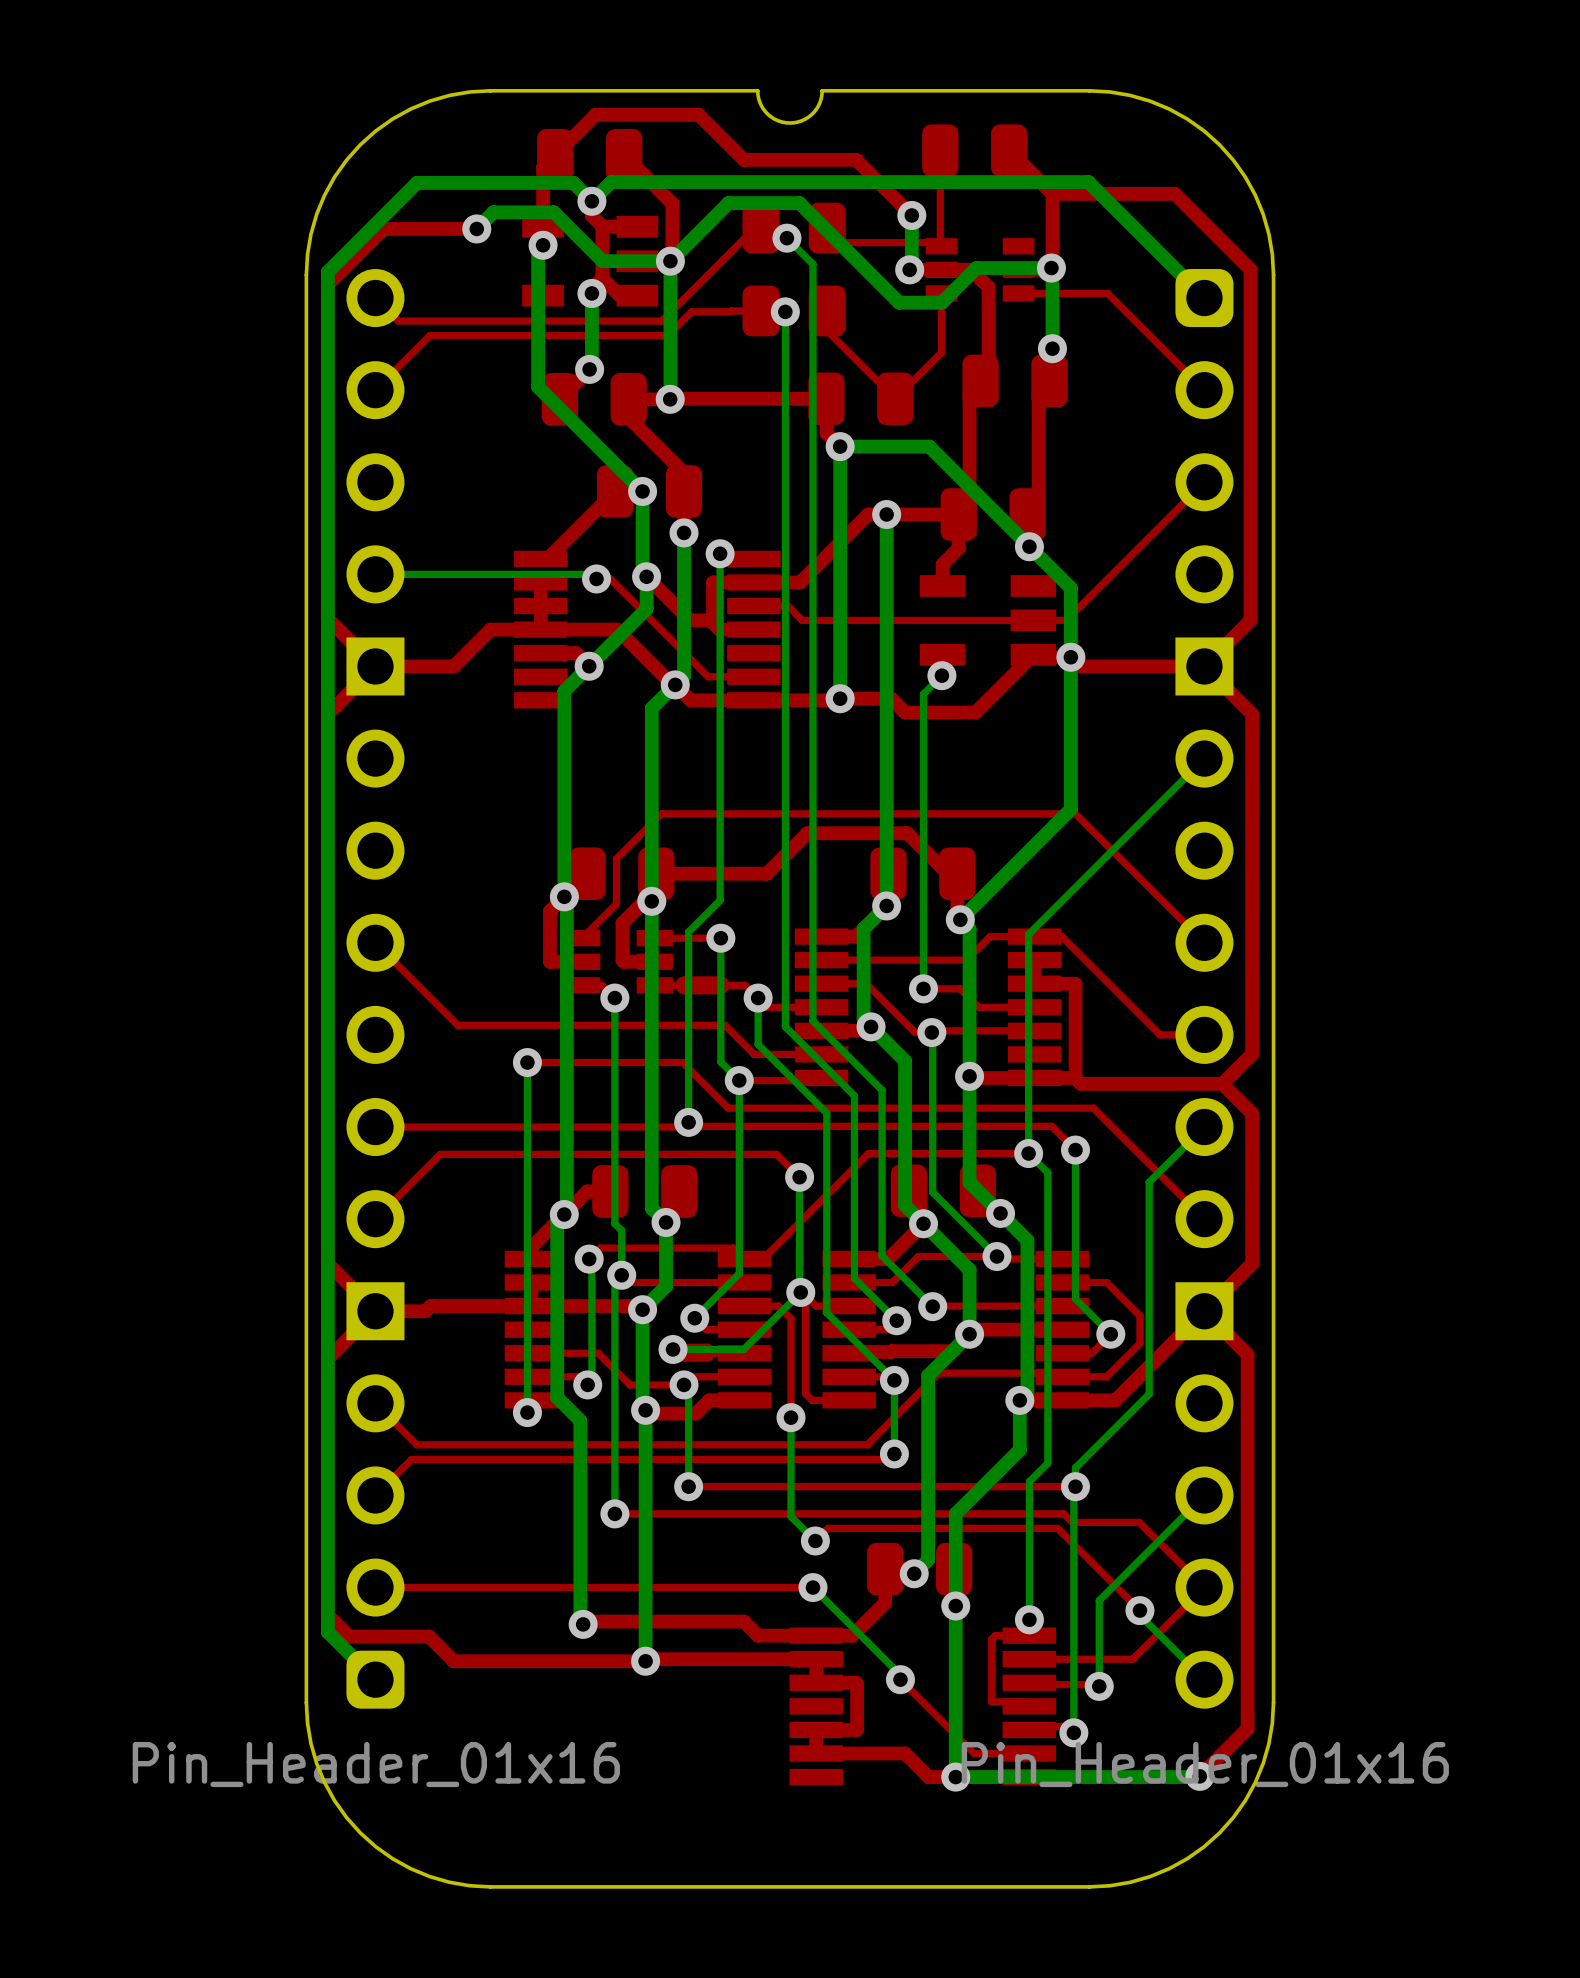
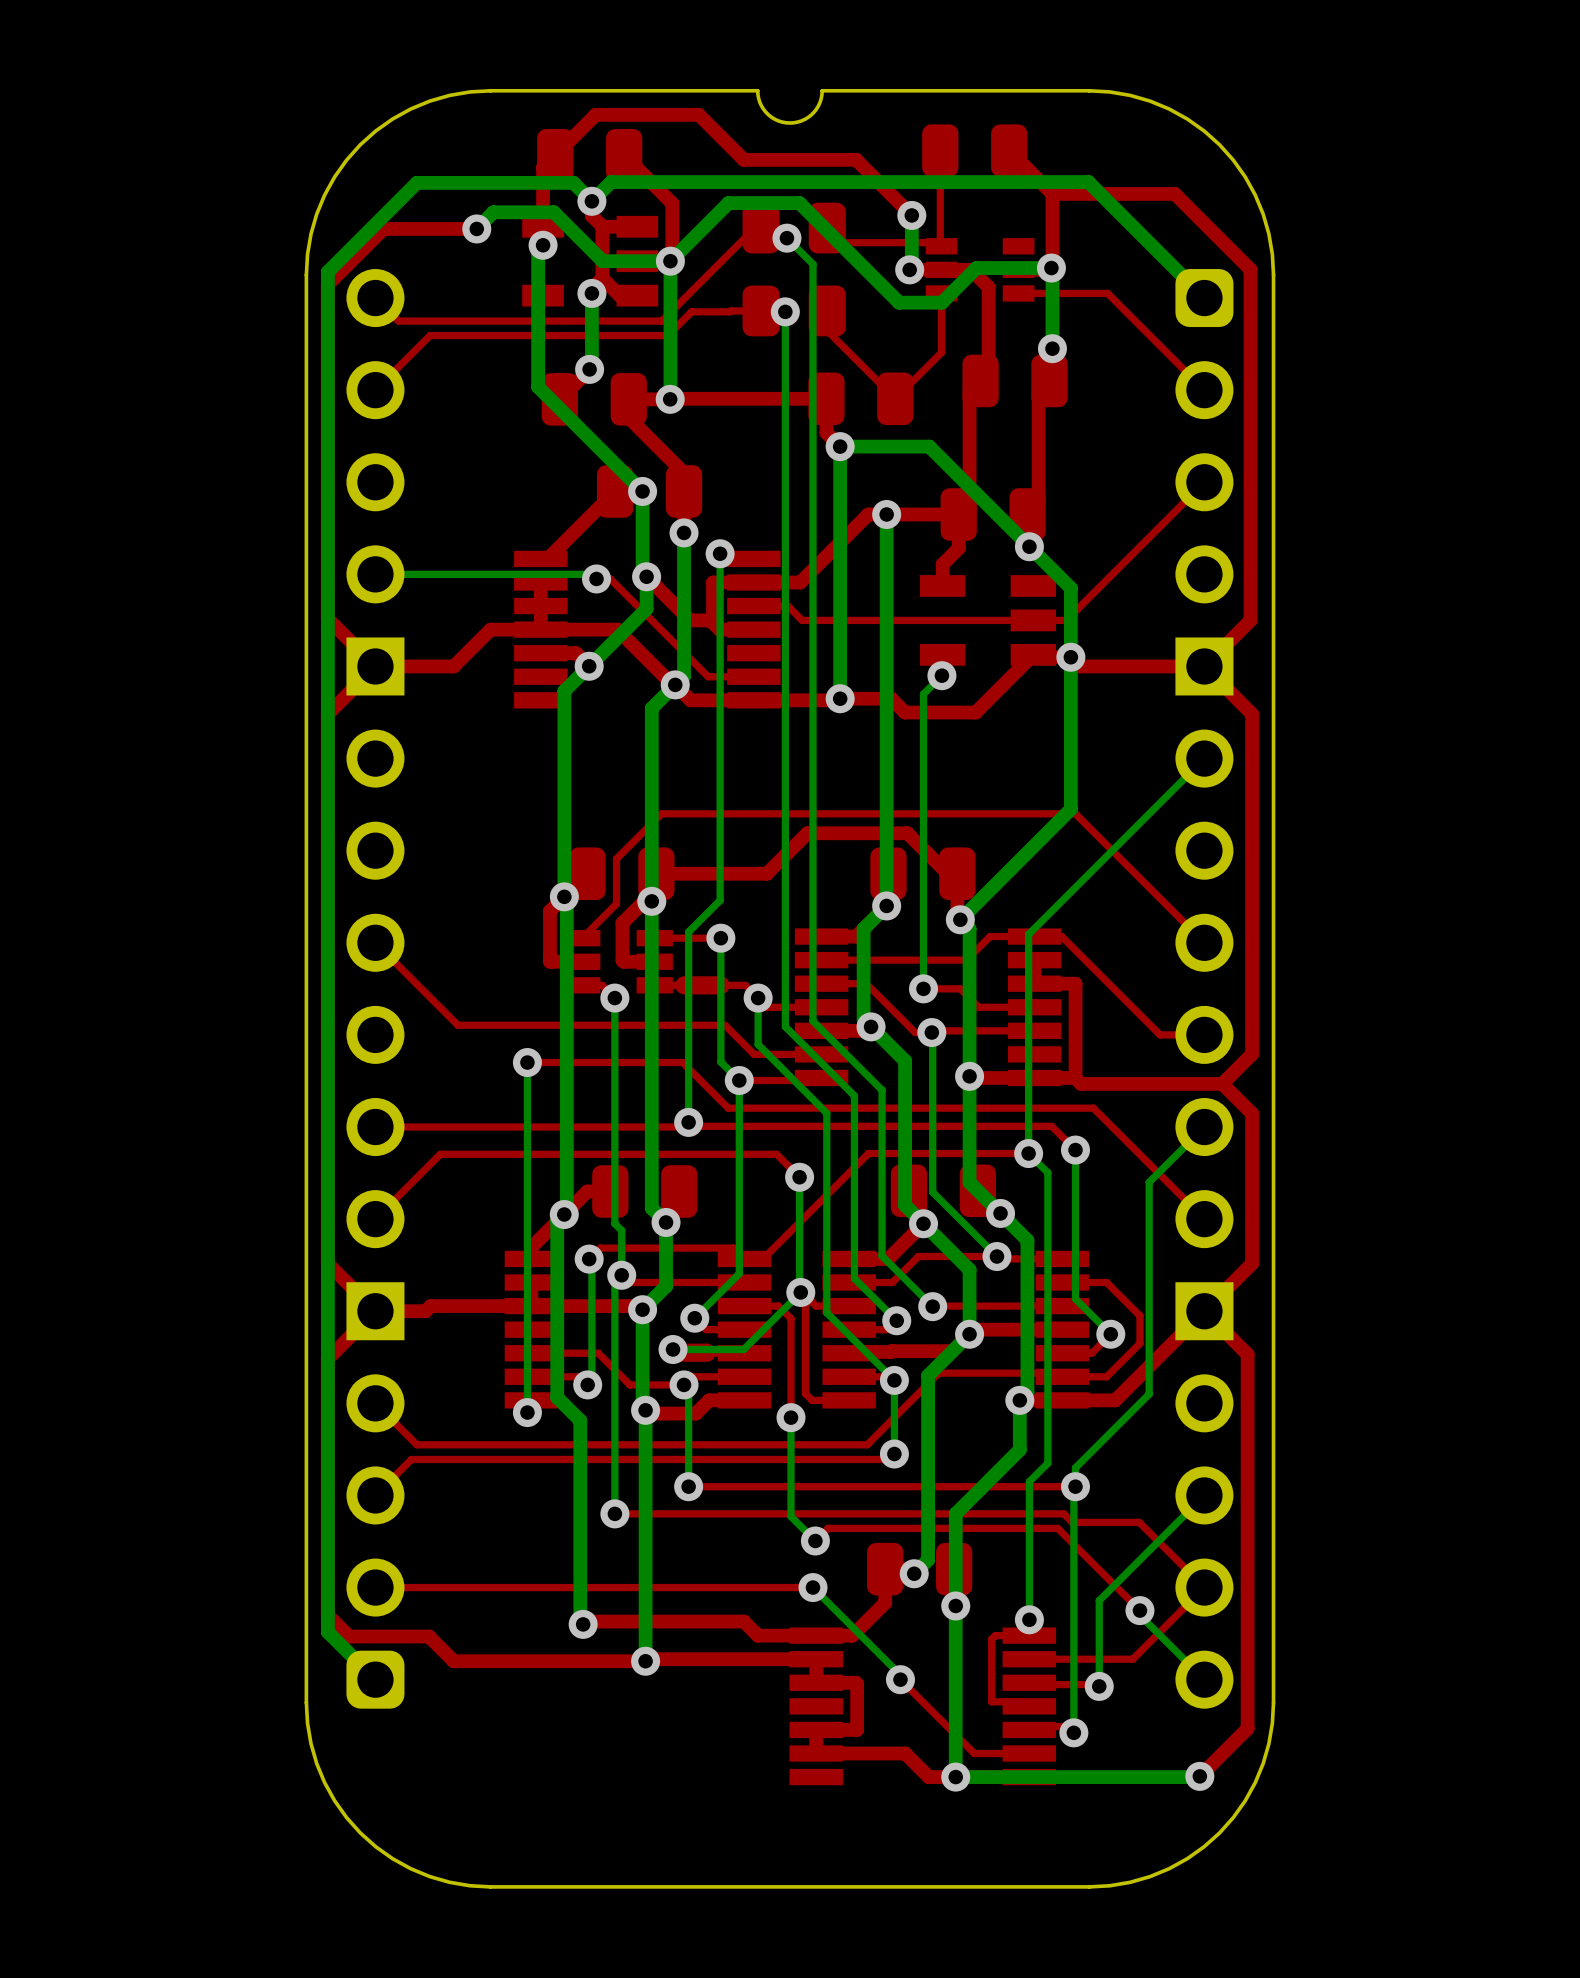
drawing: [132, 1741, 620, 1788] -> none
drawing: [961, 1741, 1449, 1788] -> none

